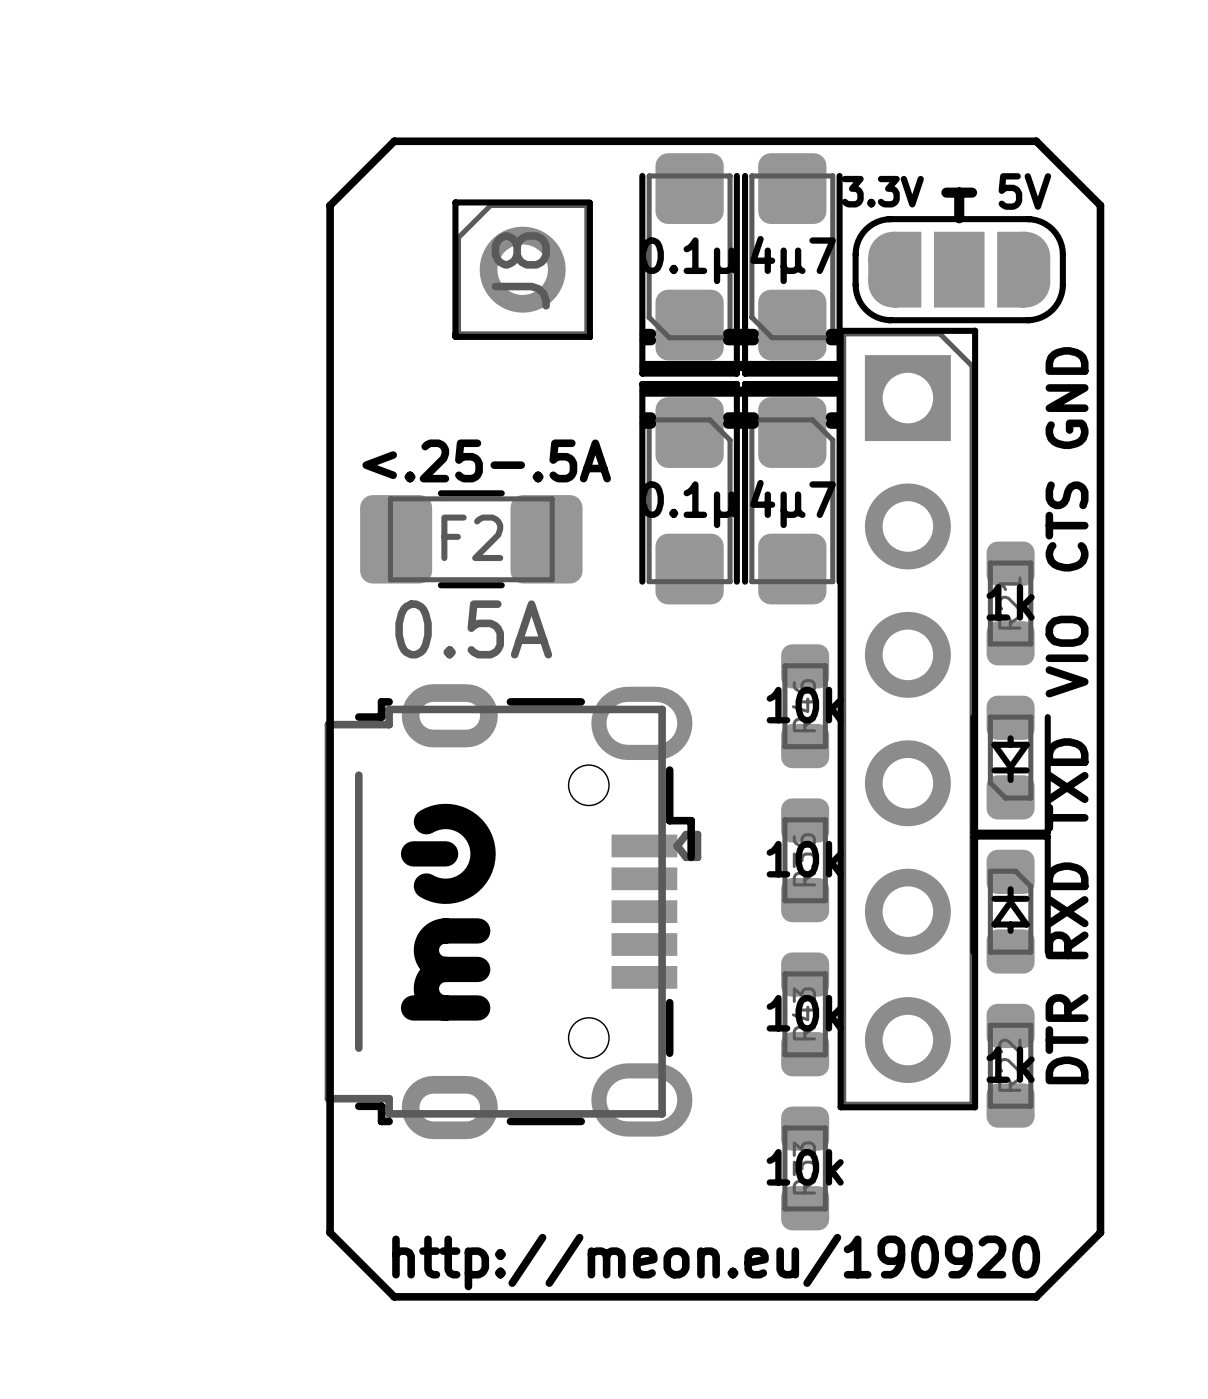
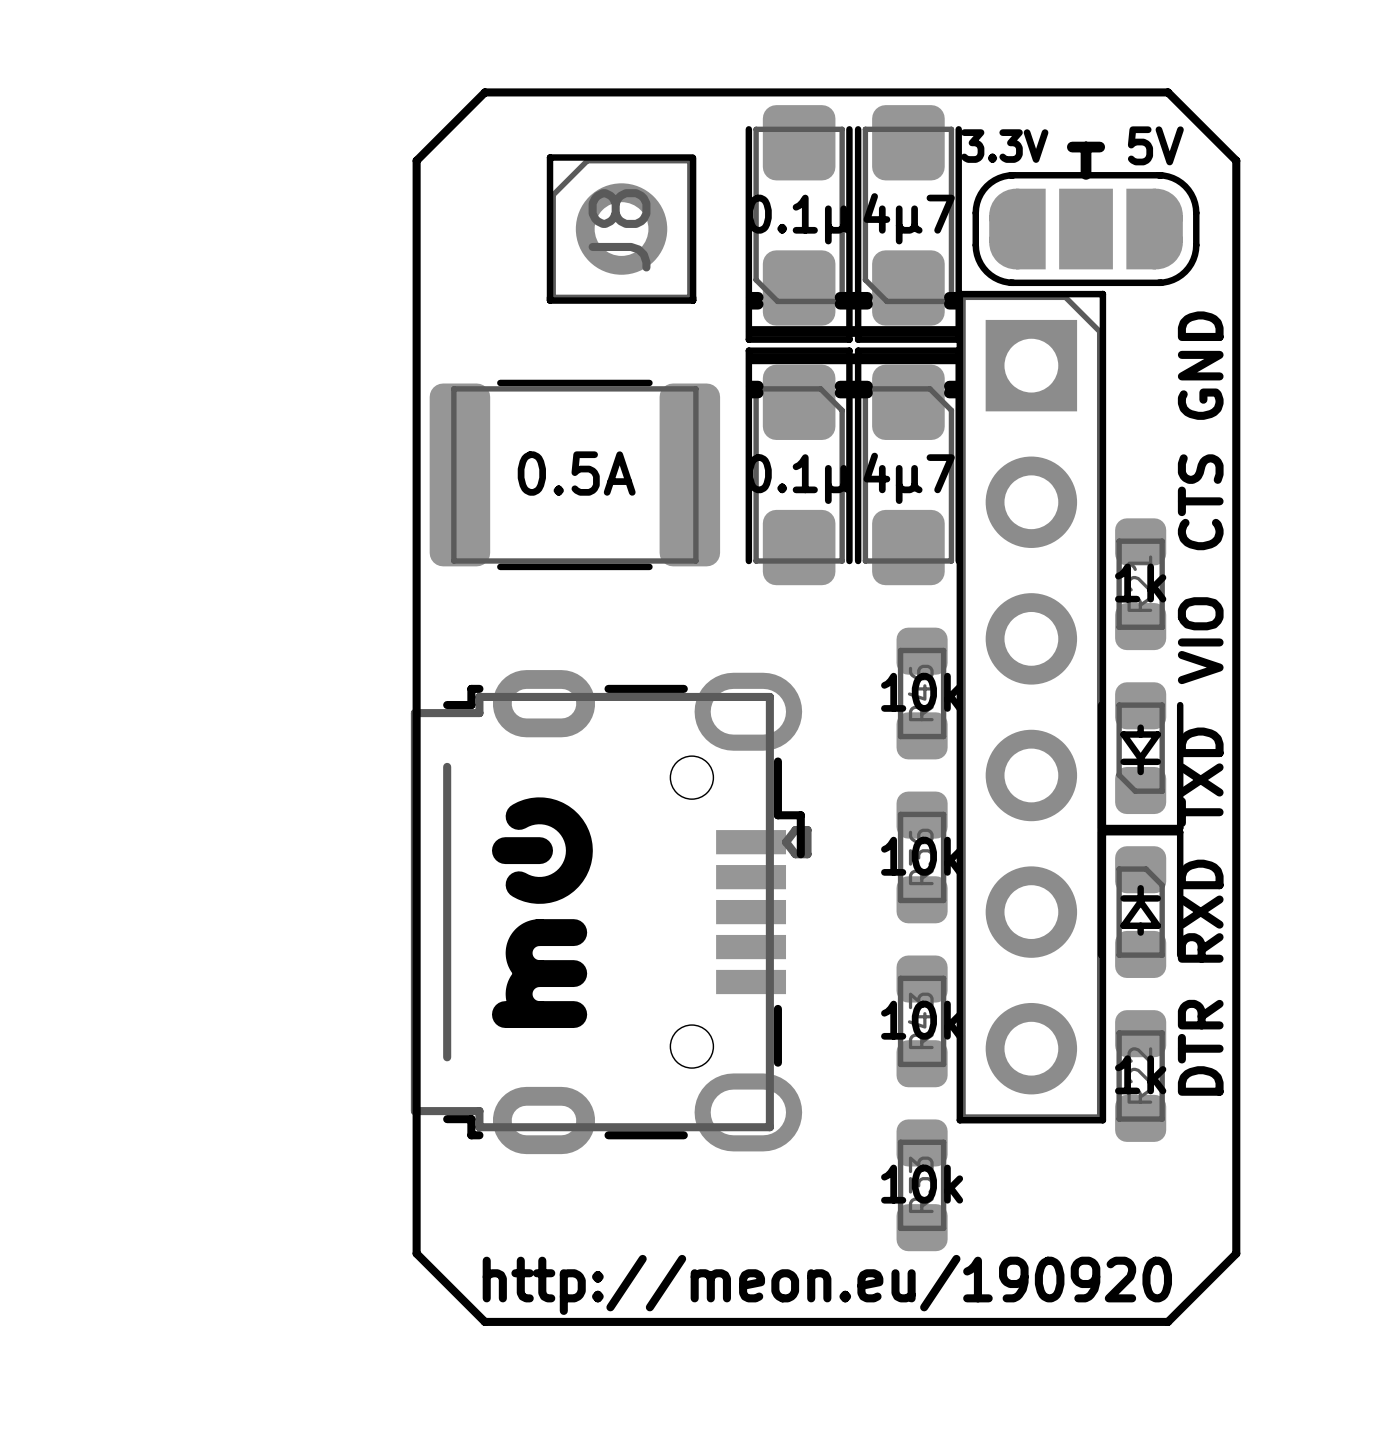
text: <.25-.5A (486, 460) -> none
part: none -> 0.5A (574, 474)
F2: 0.5A (471, 539) -> none

